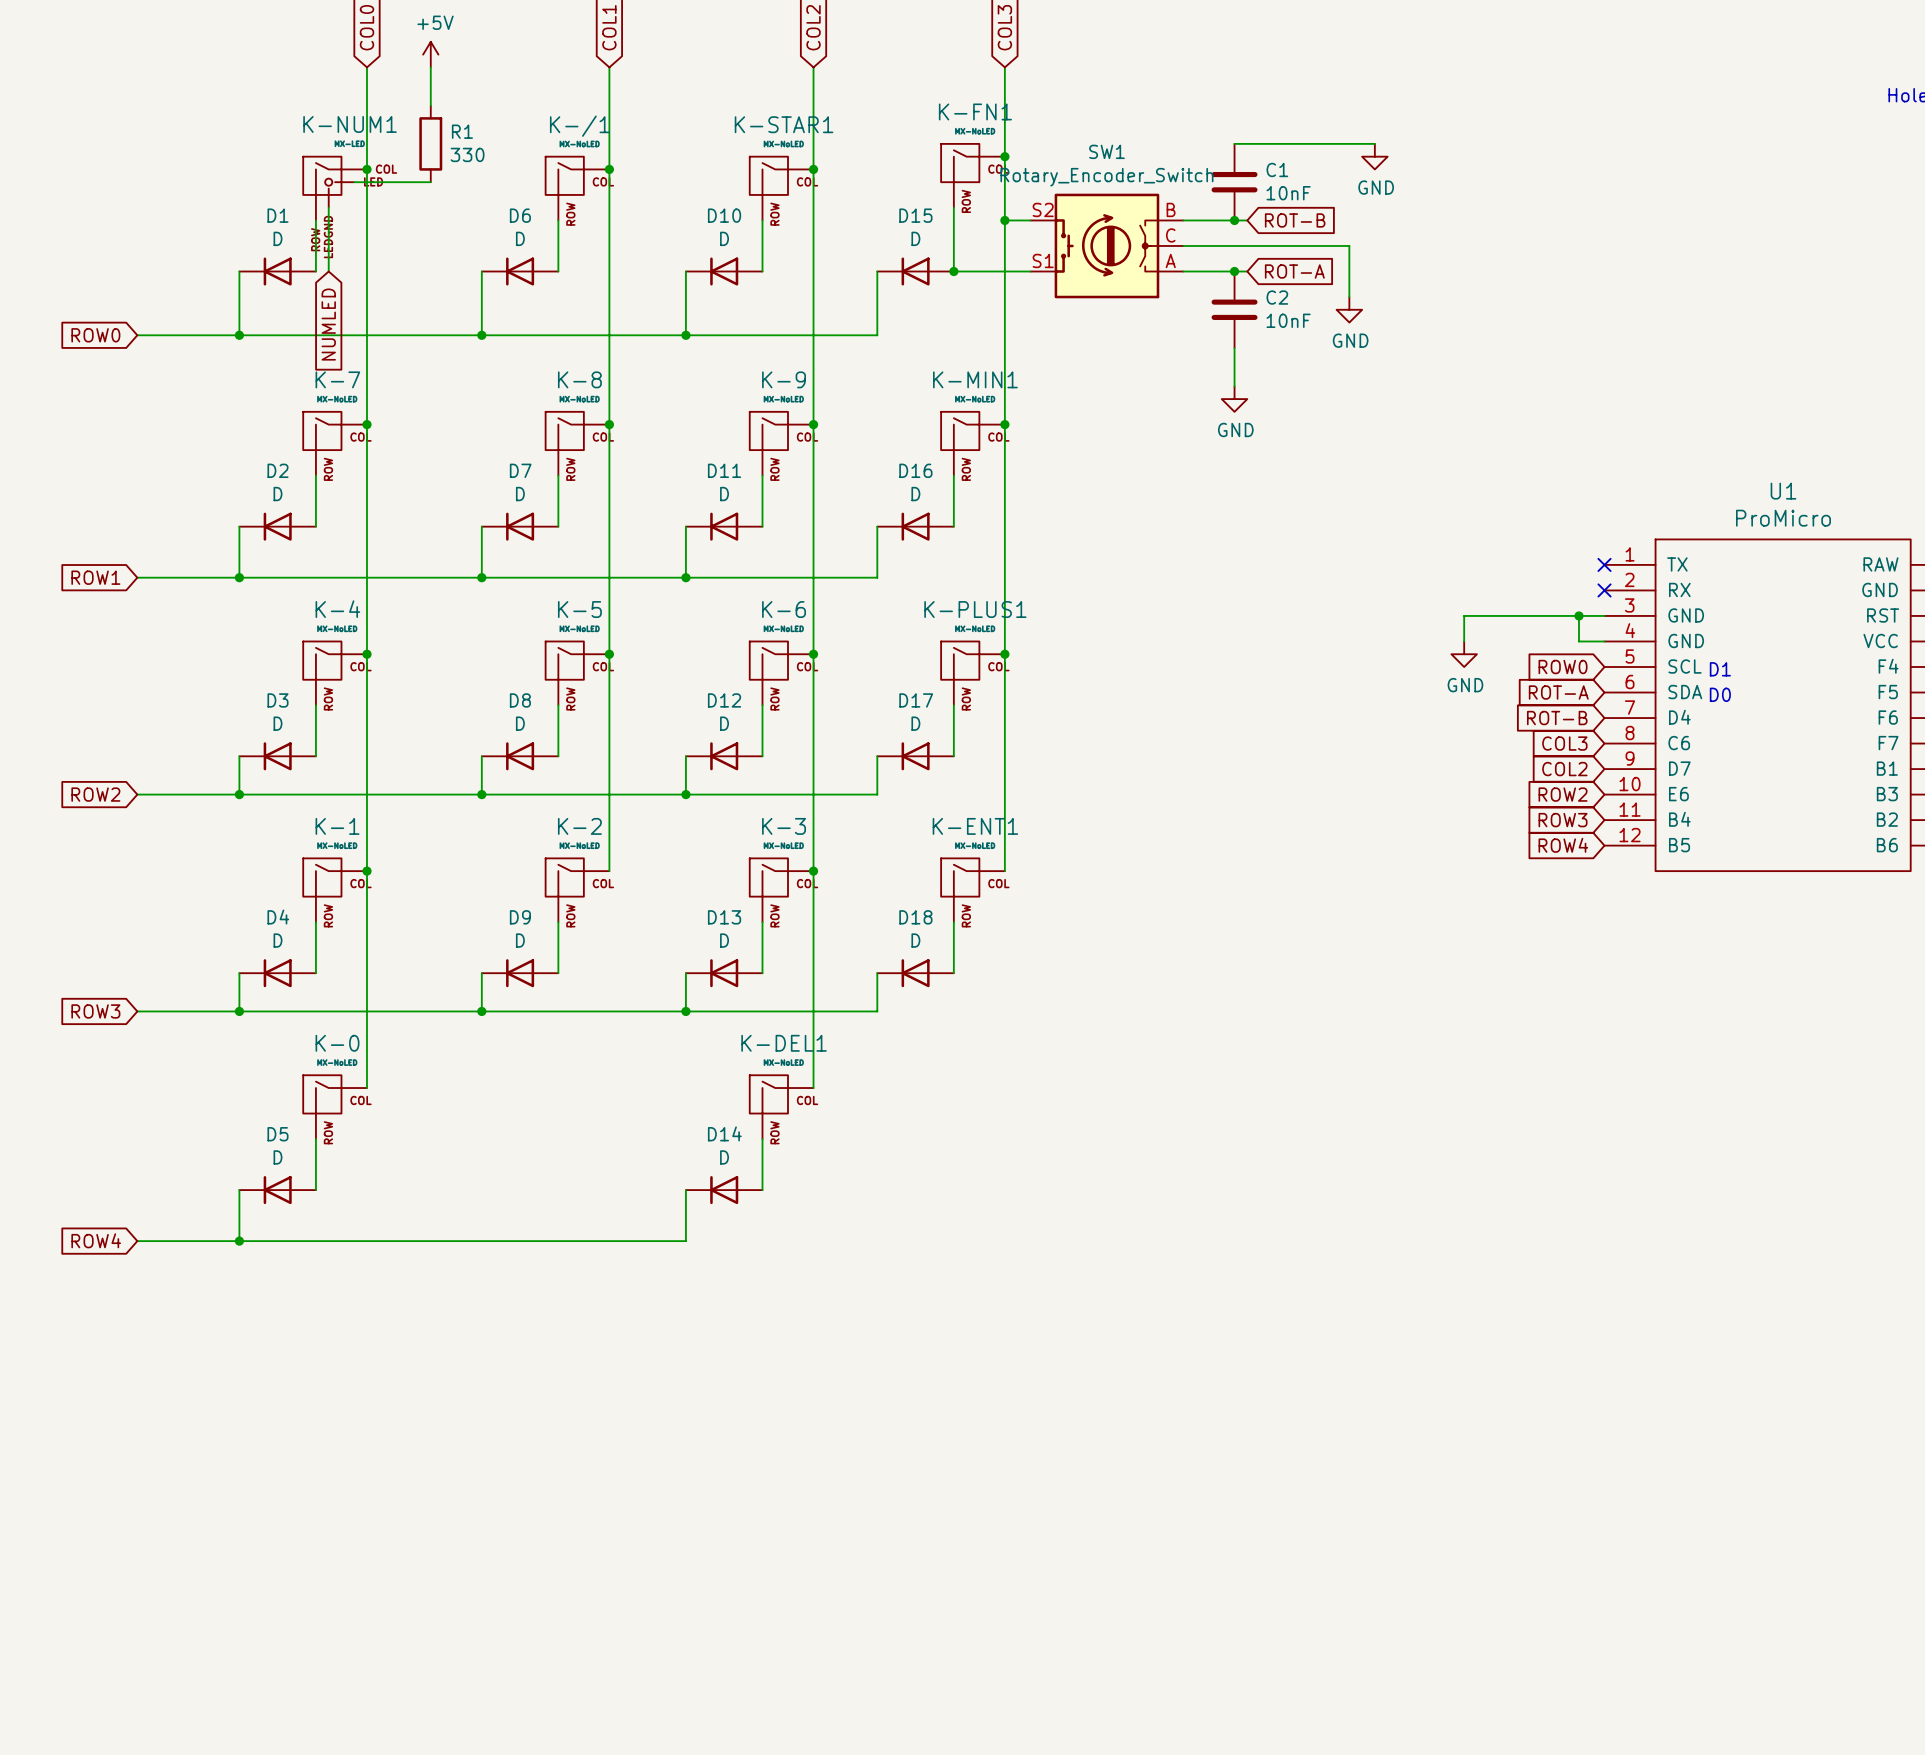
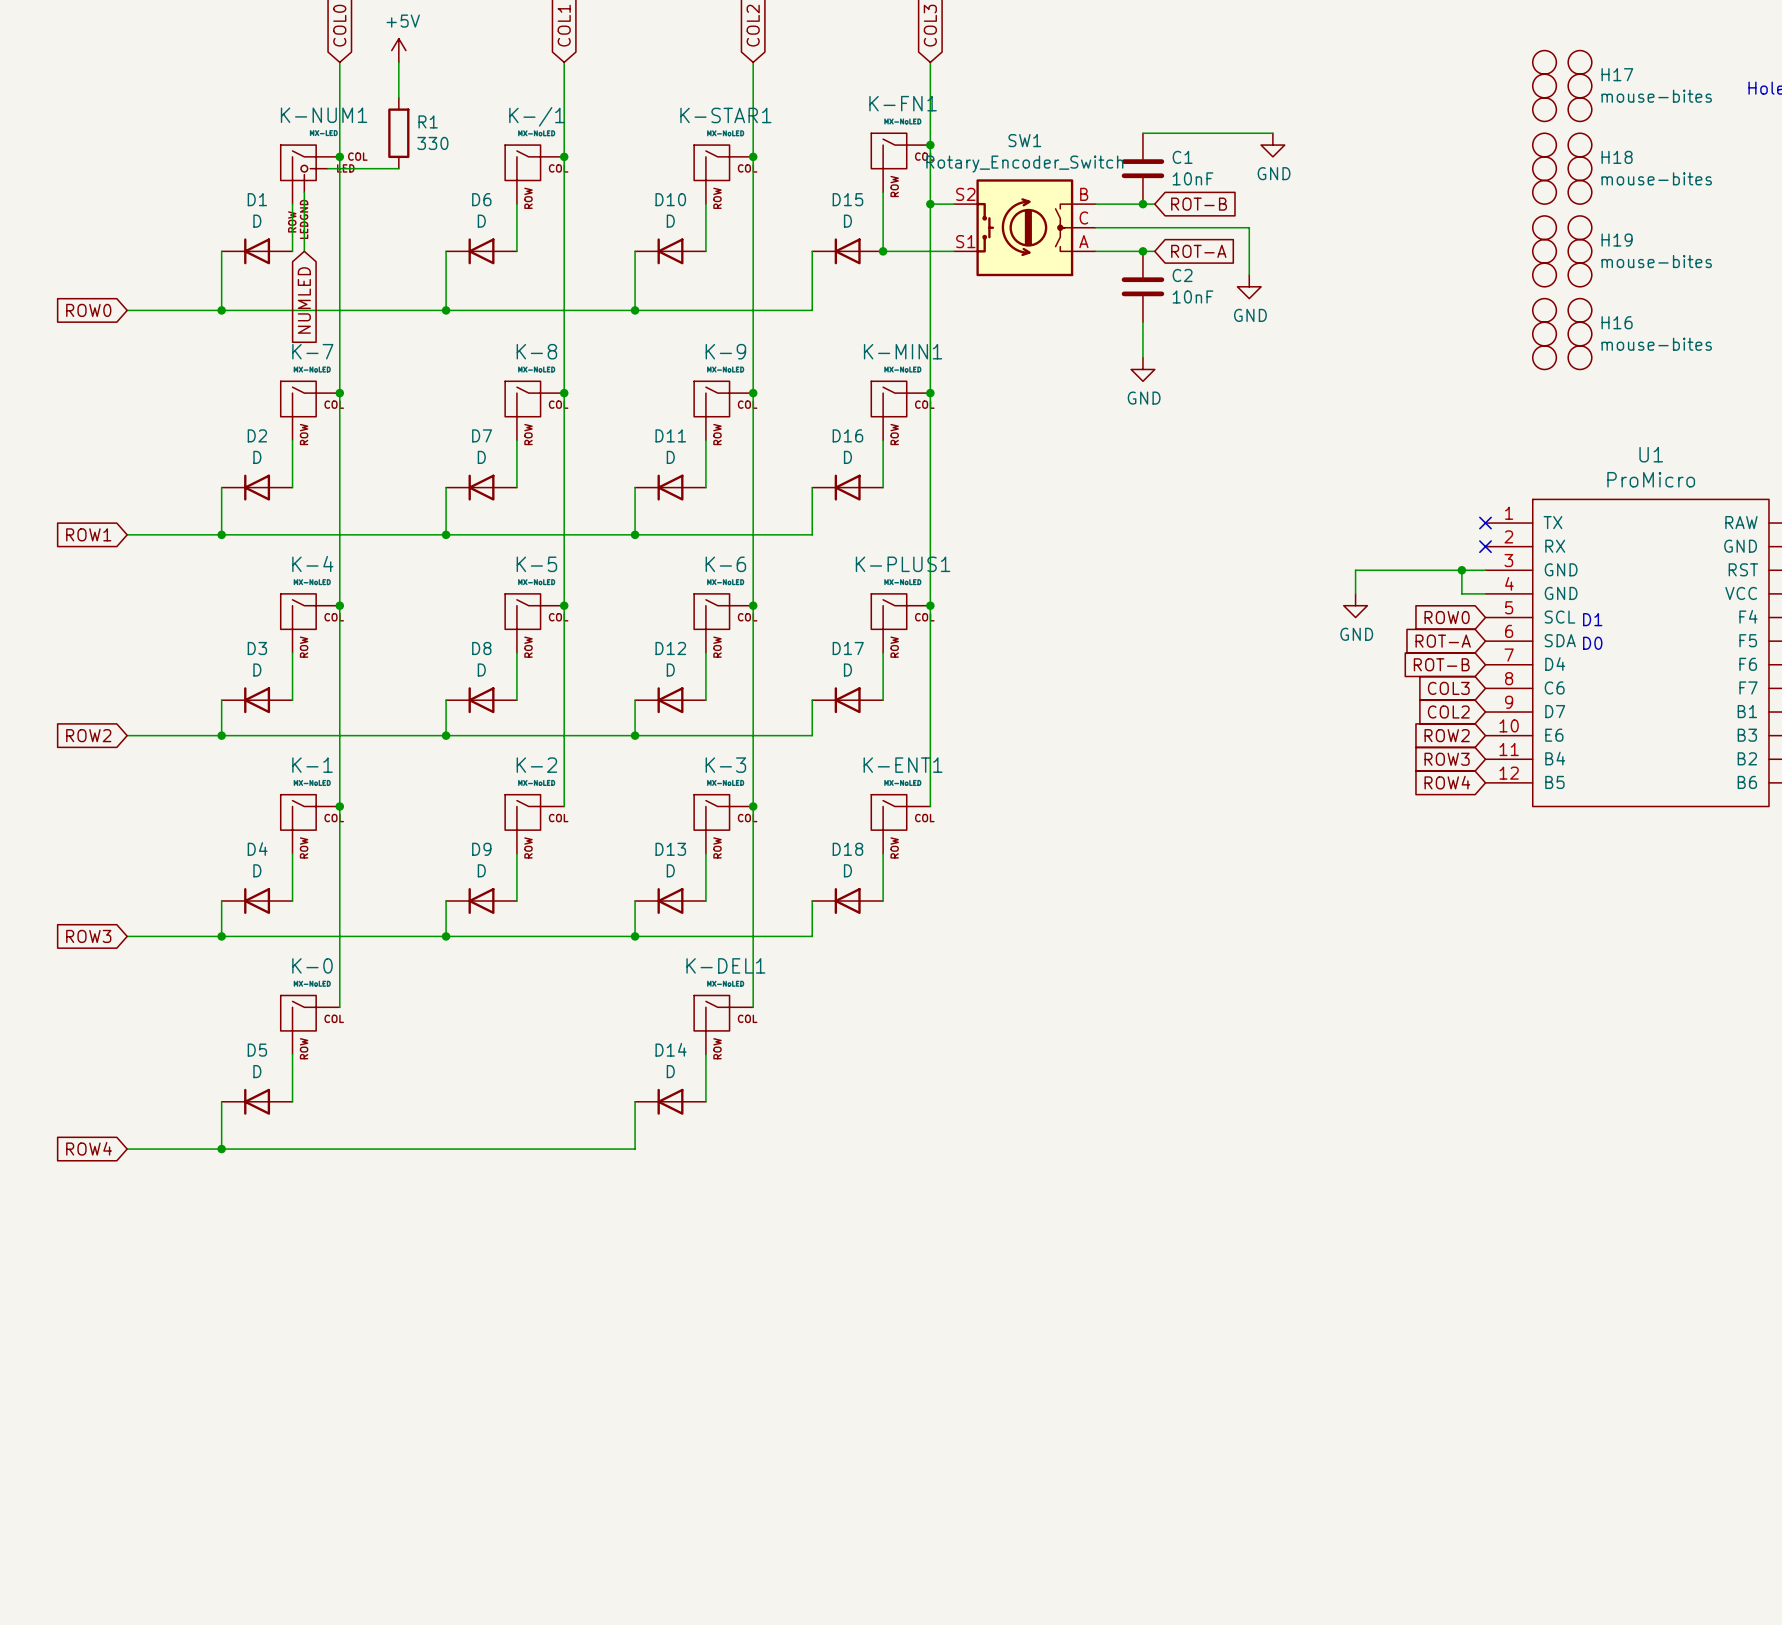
H17: none -> mouse-bites (1562, 86)
H18: none -> mouse-bites (1562, 168)
H19: none -> mouse-bites (1562, 251)
H16: none -> mouse-bites (1562, 334)

